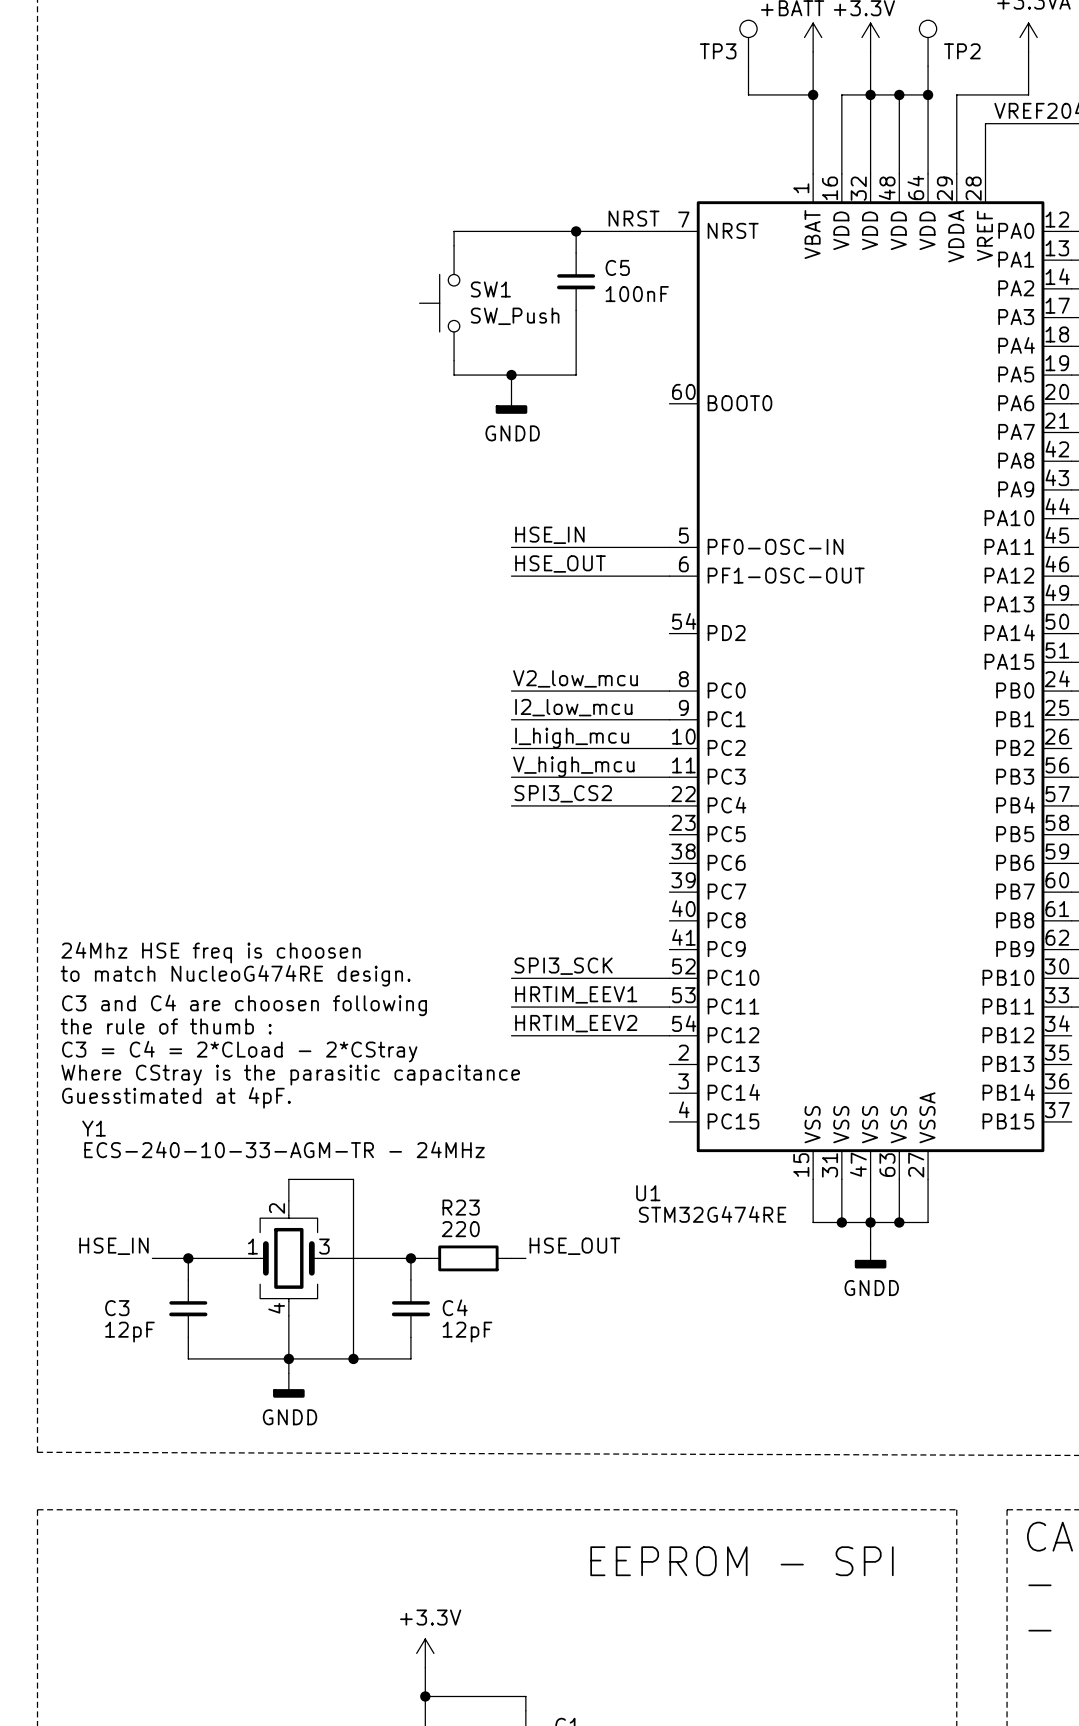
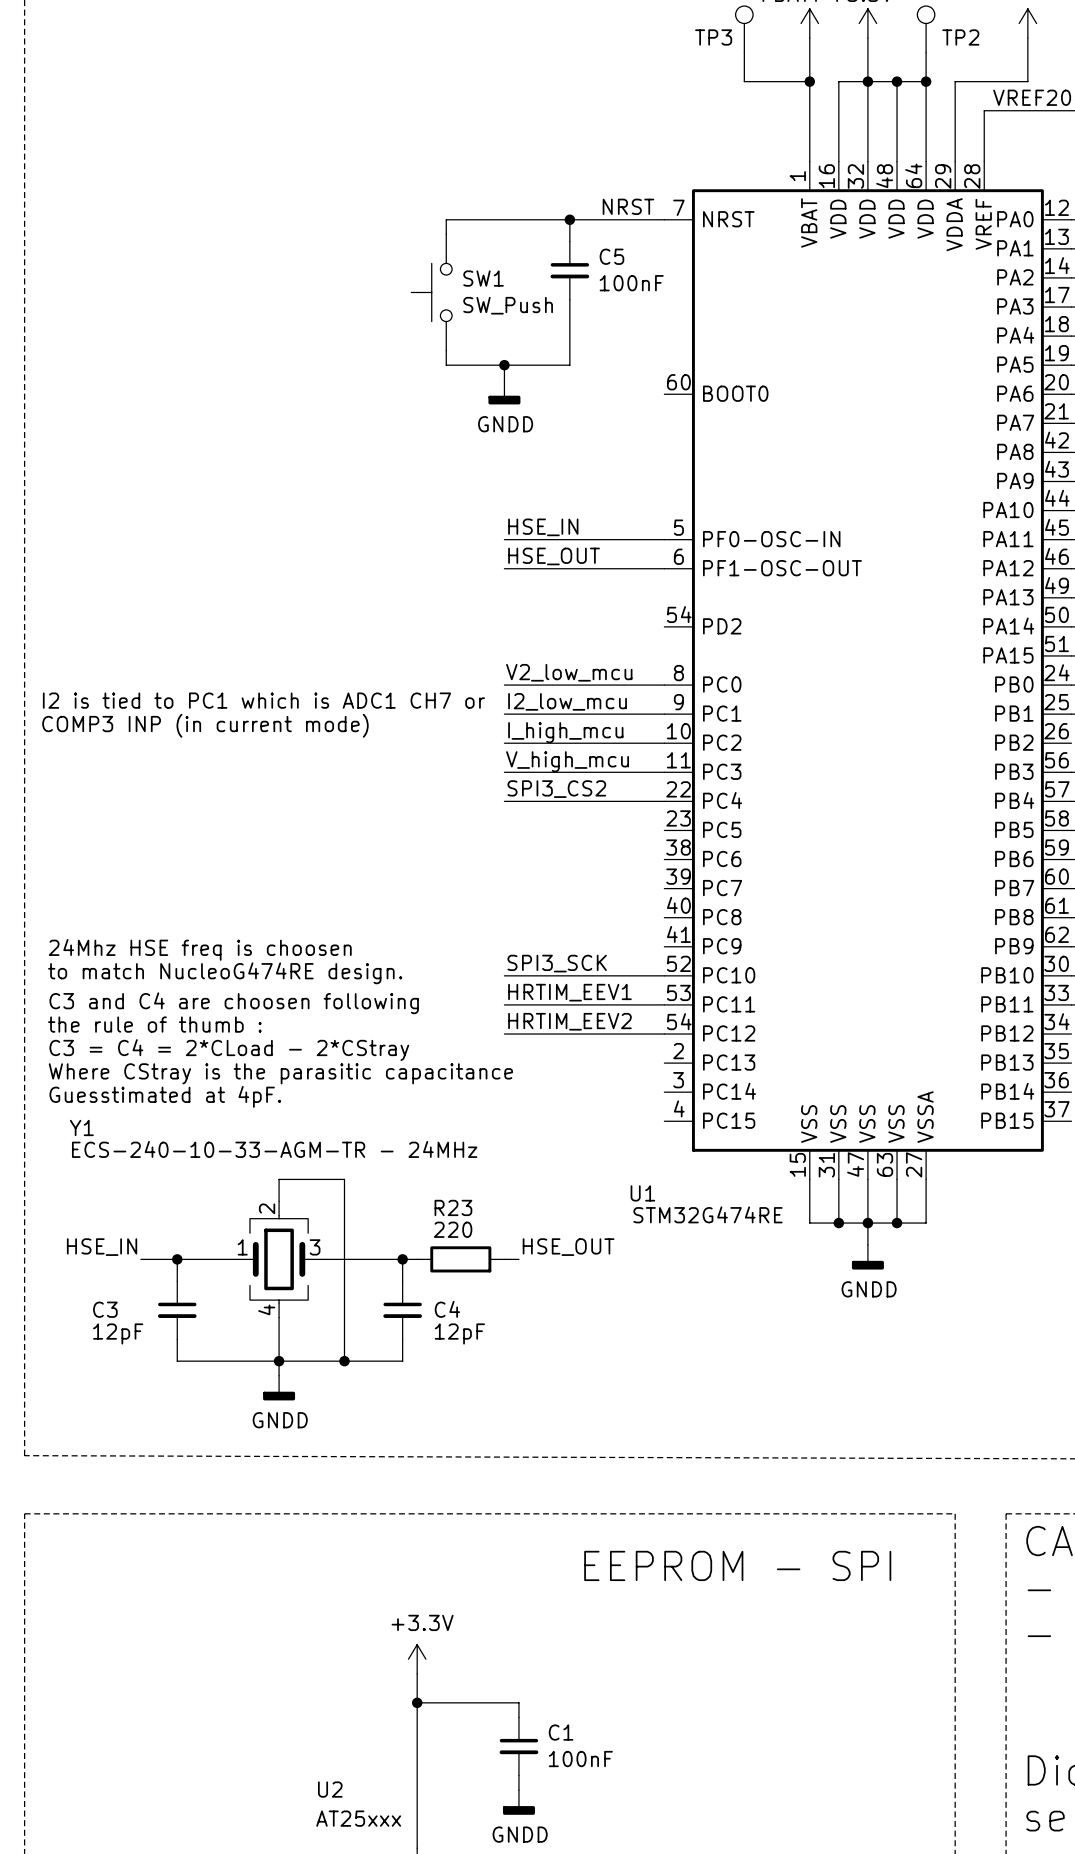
text: none -> I2 is tied to PC1 which is ADC1 CH7 or (263, 700)
text: none -> COMP3 INP (in current mode) (205, 725)

